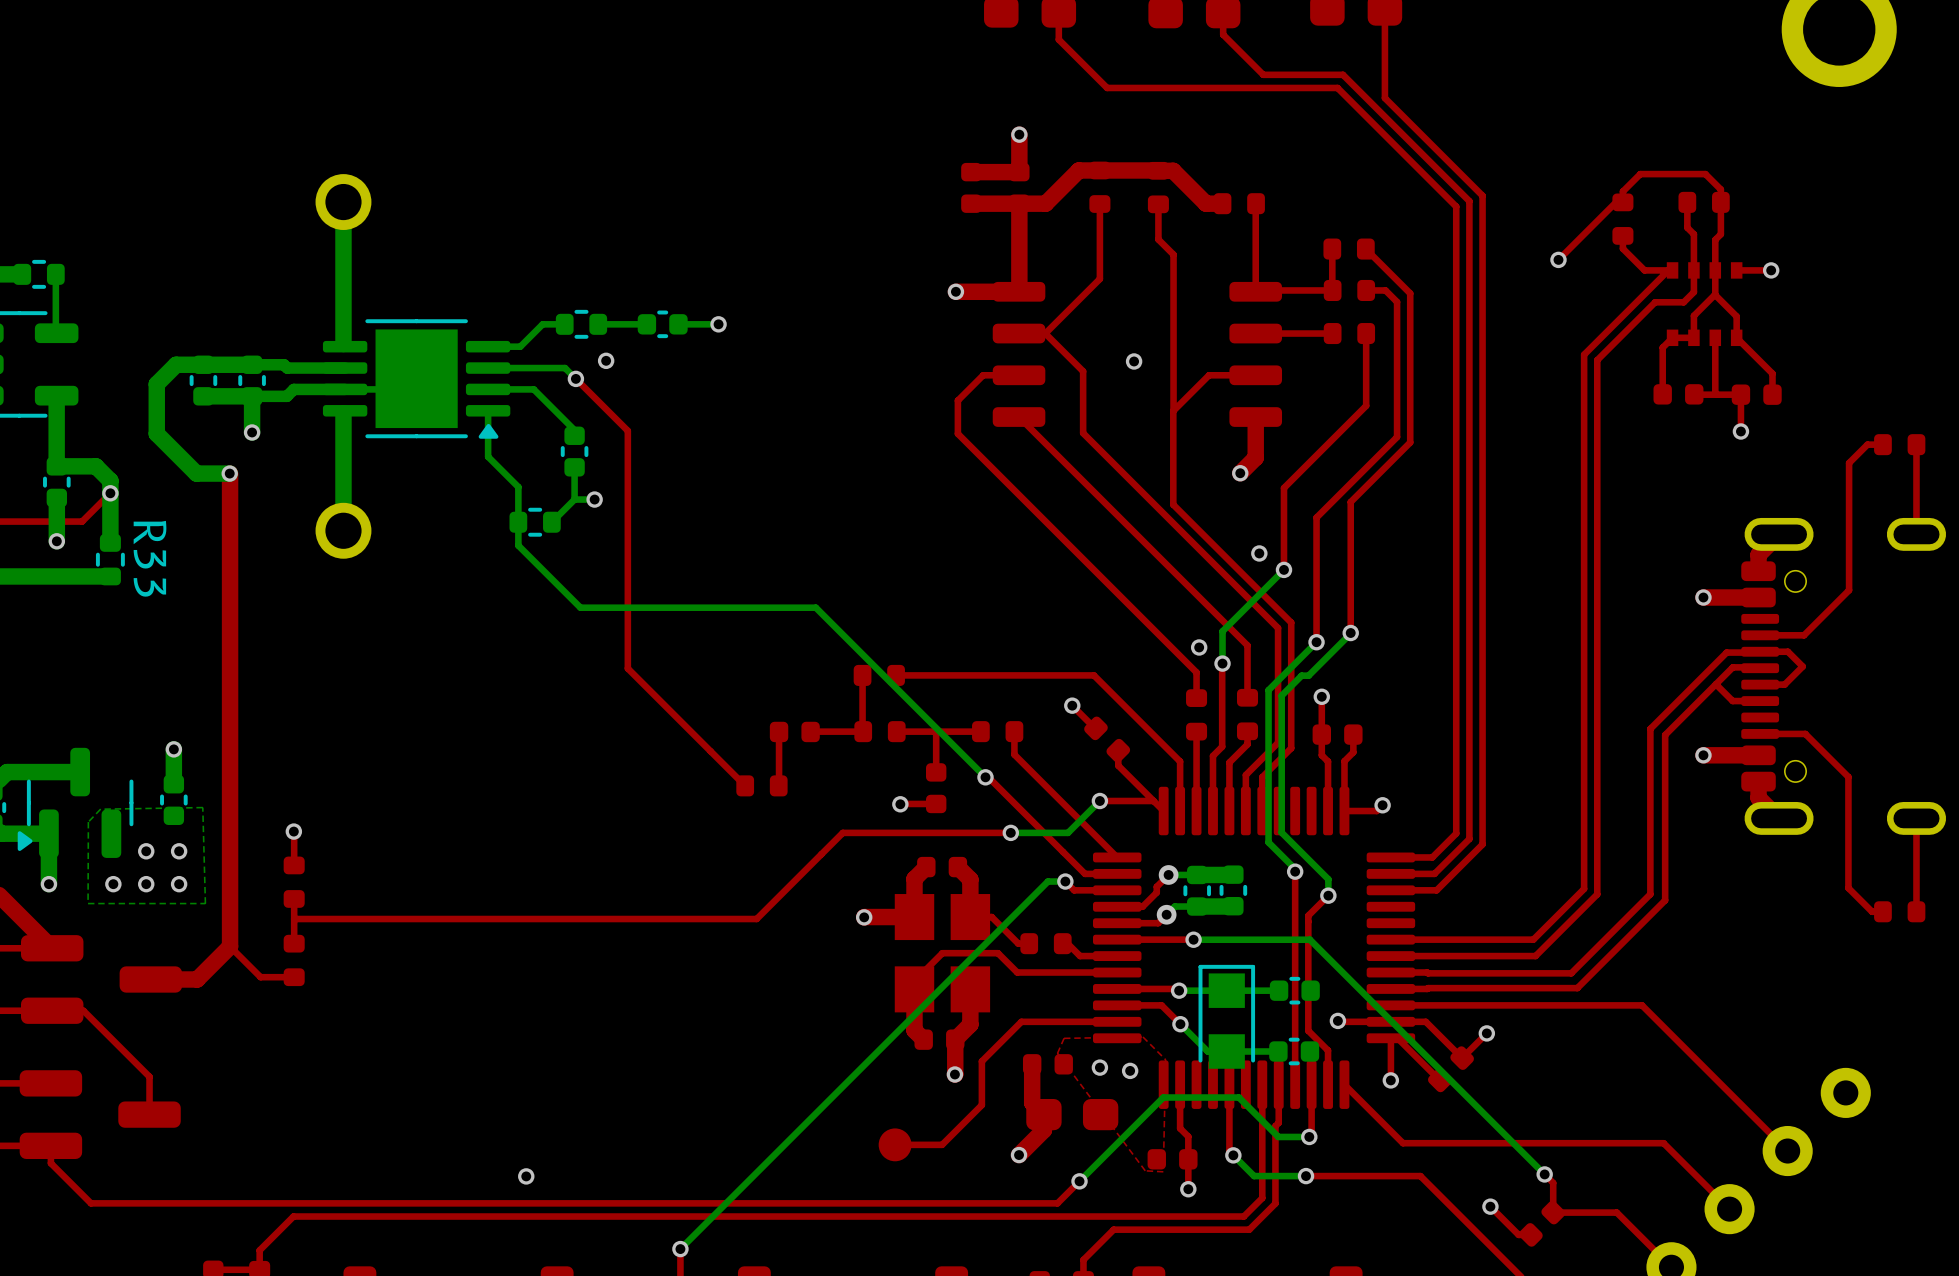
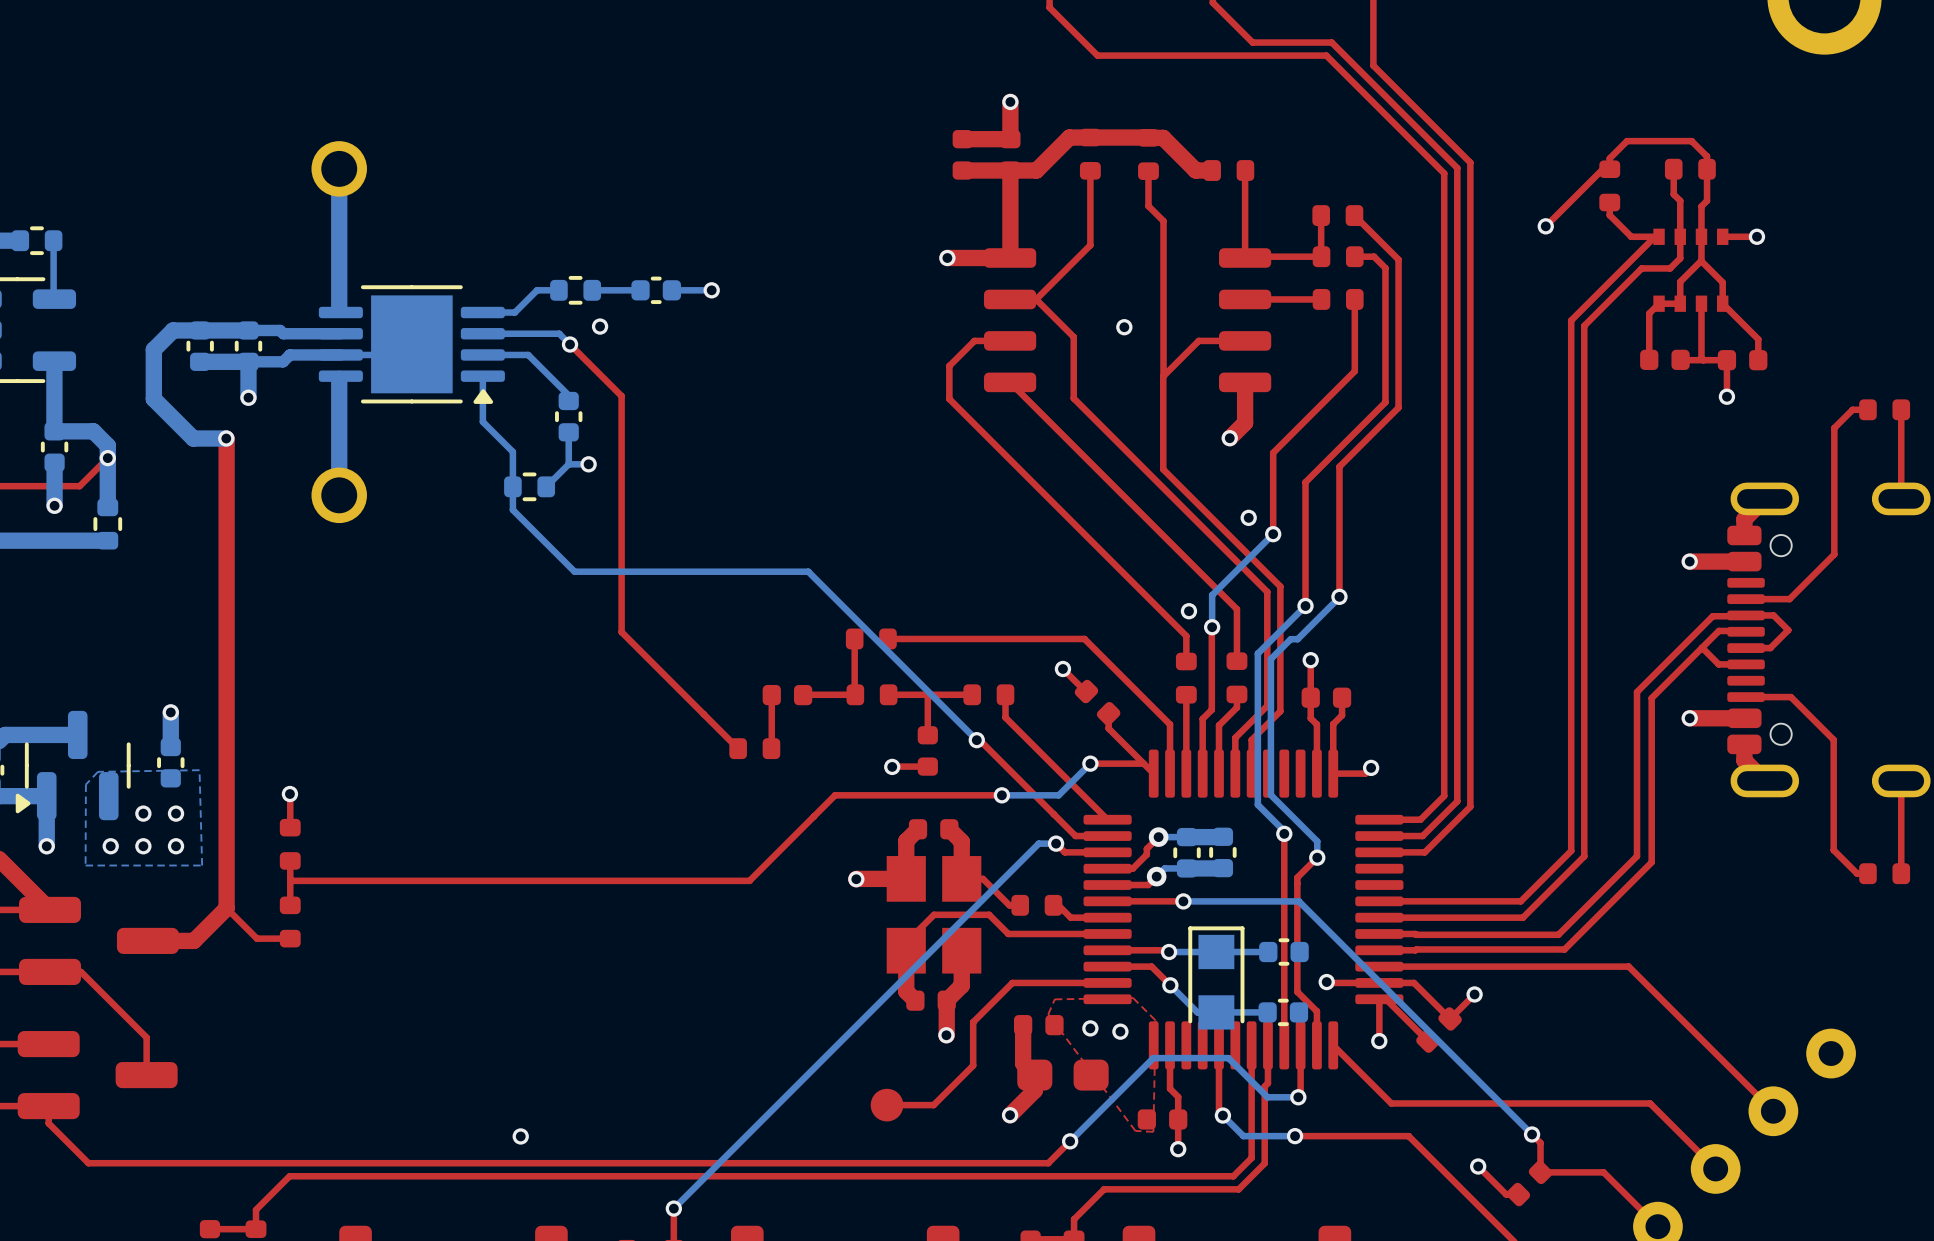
R33 name: R33 (150, 558) -> none

